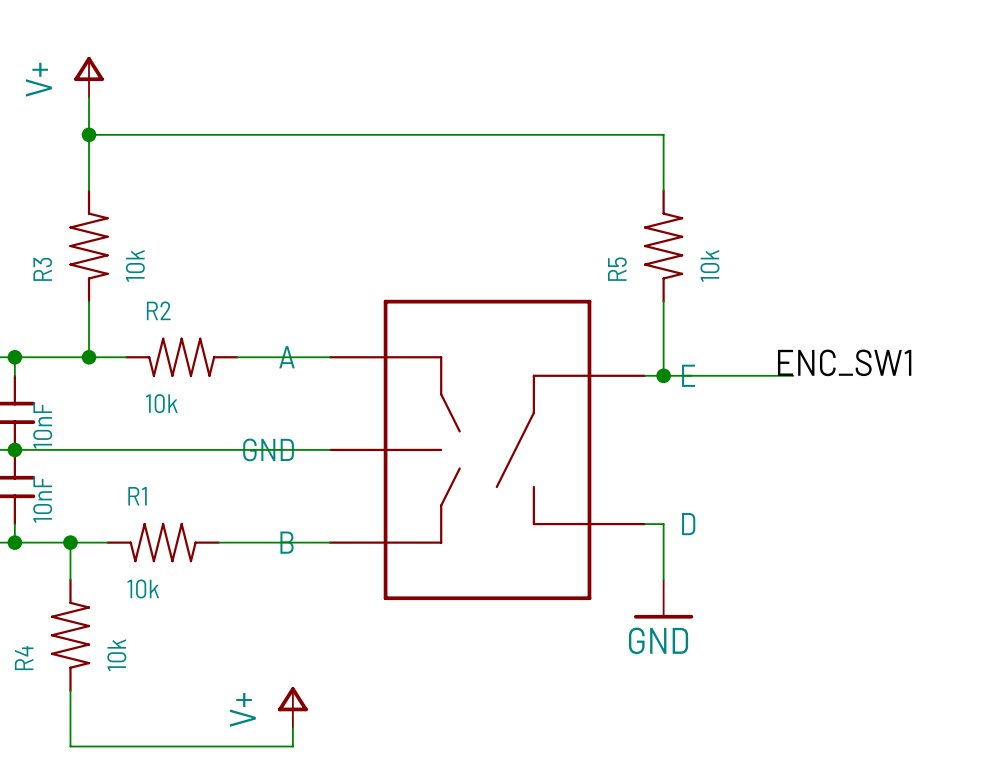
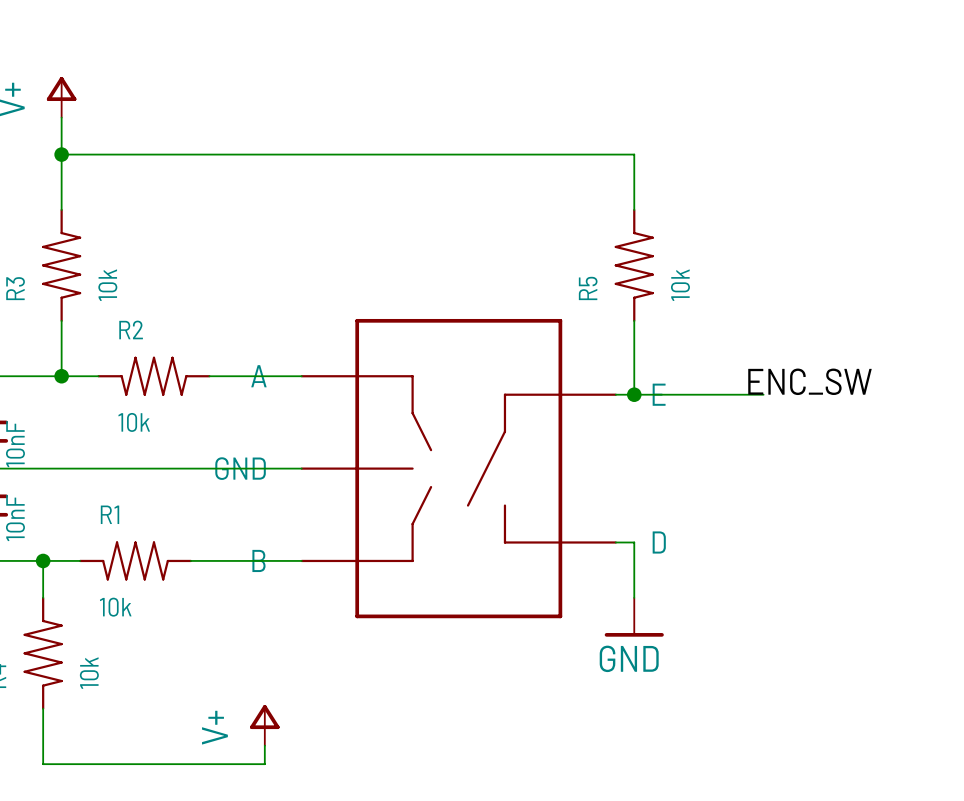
label: ENC_SW1 (844, 362) -> ENC_SW (809, 381)

